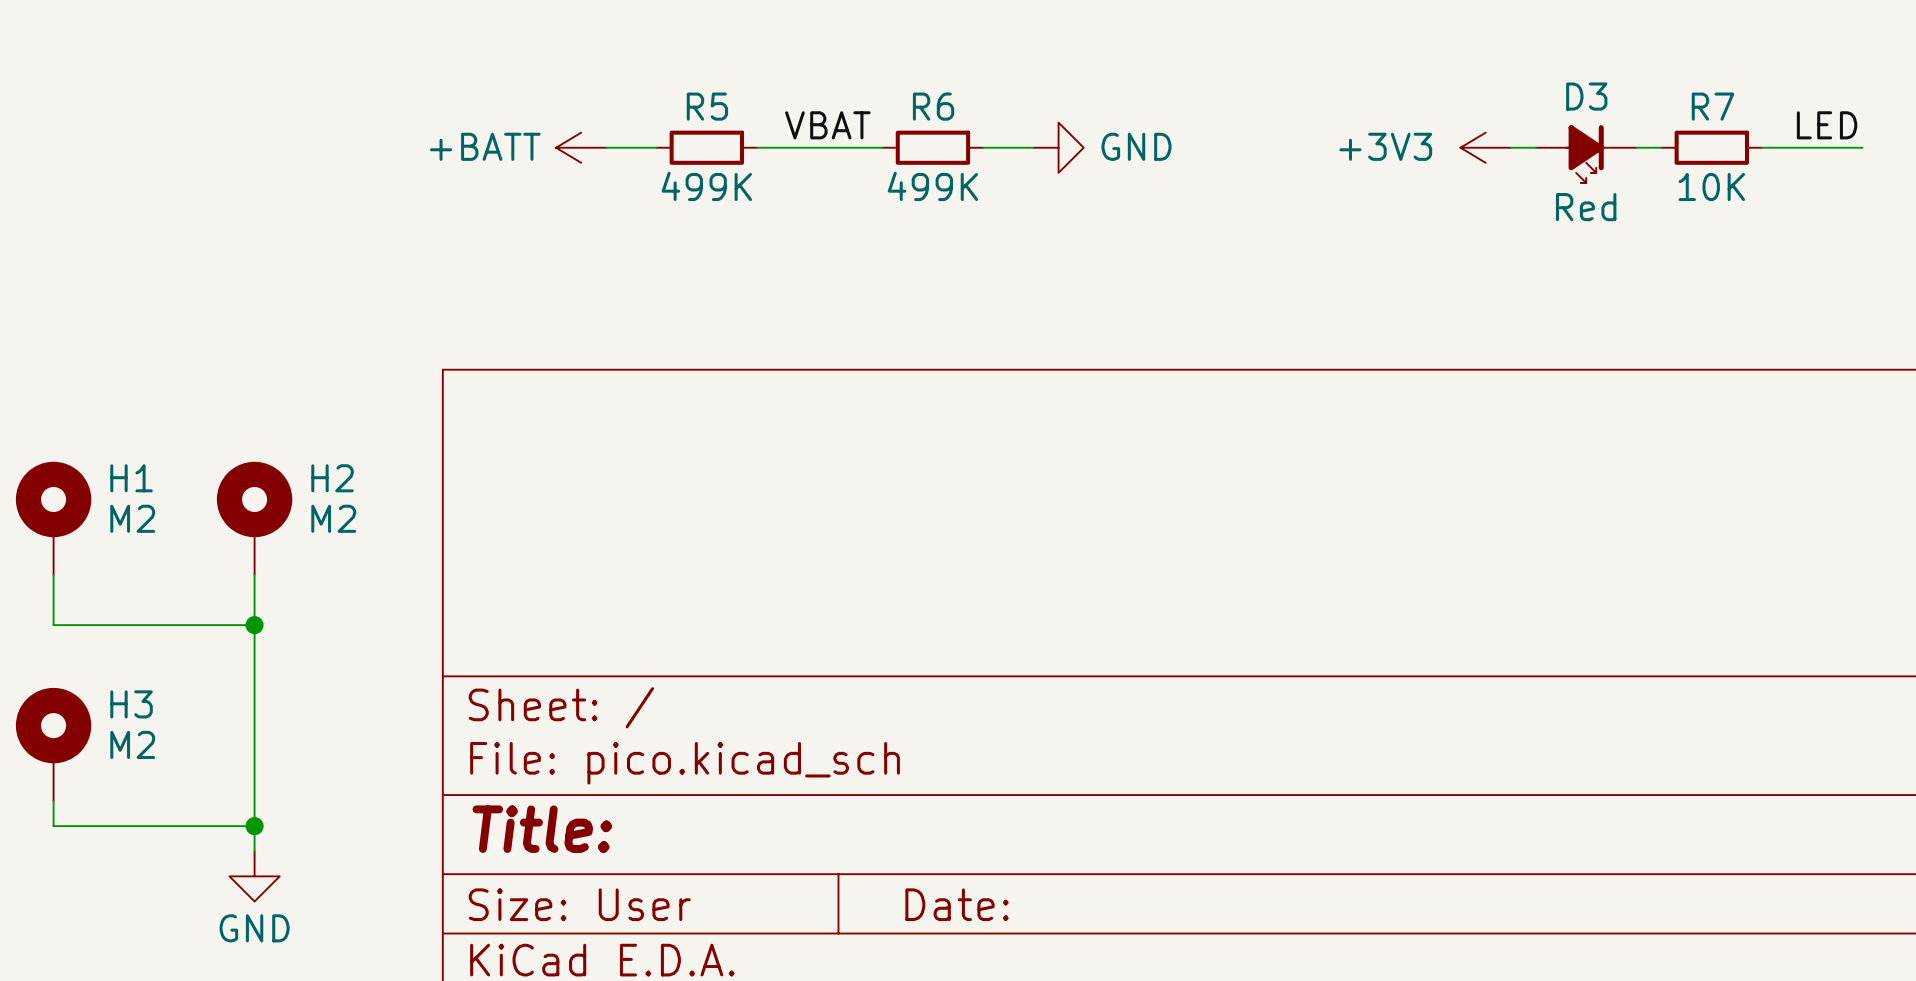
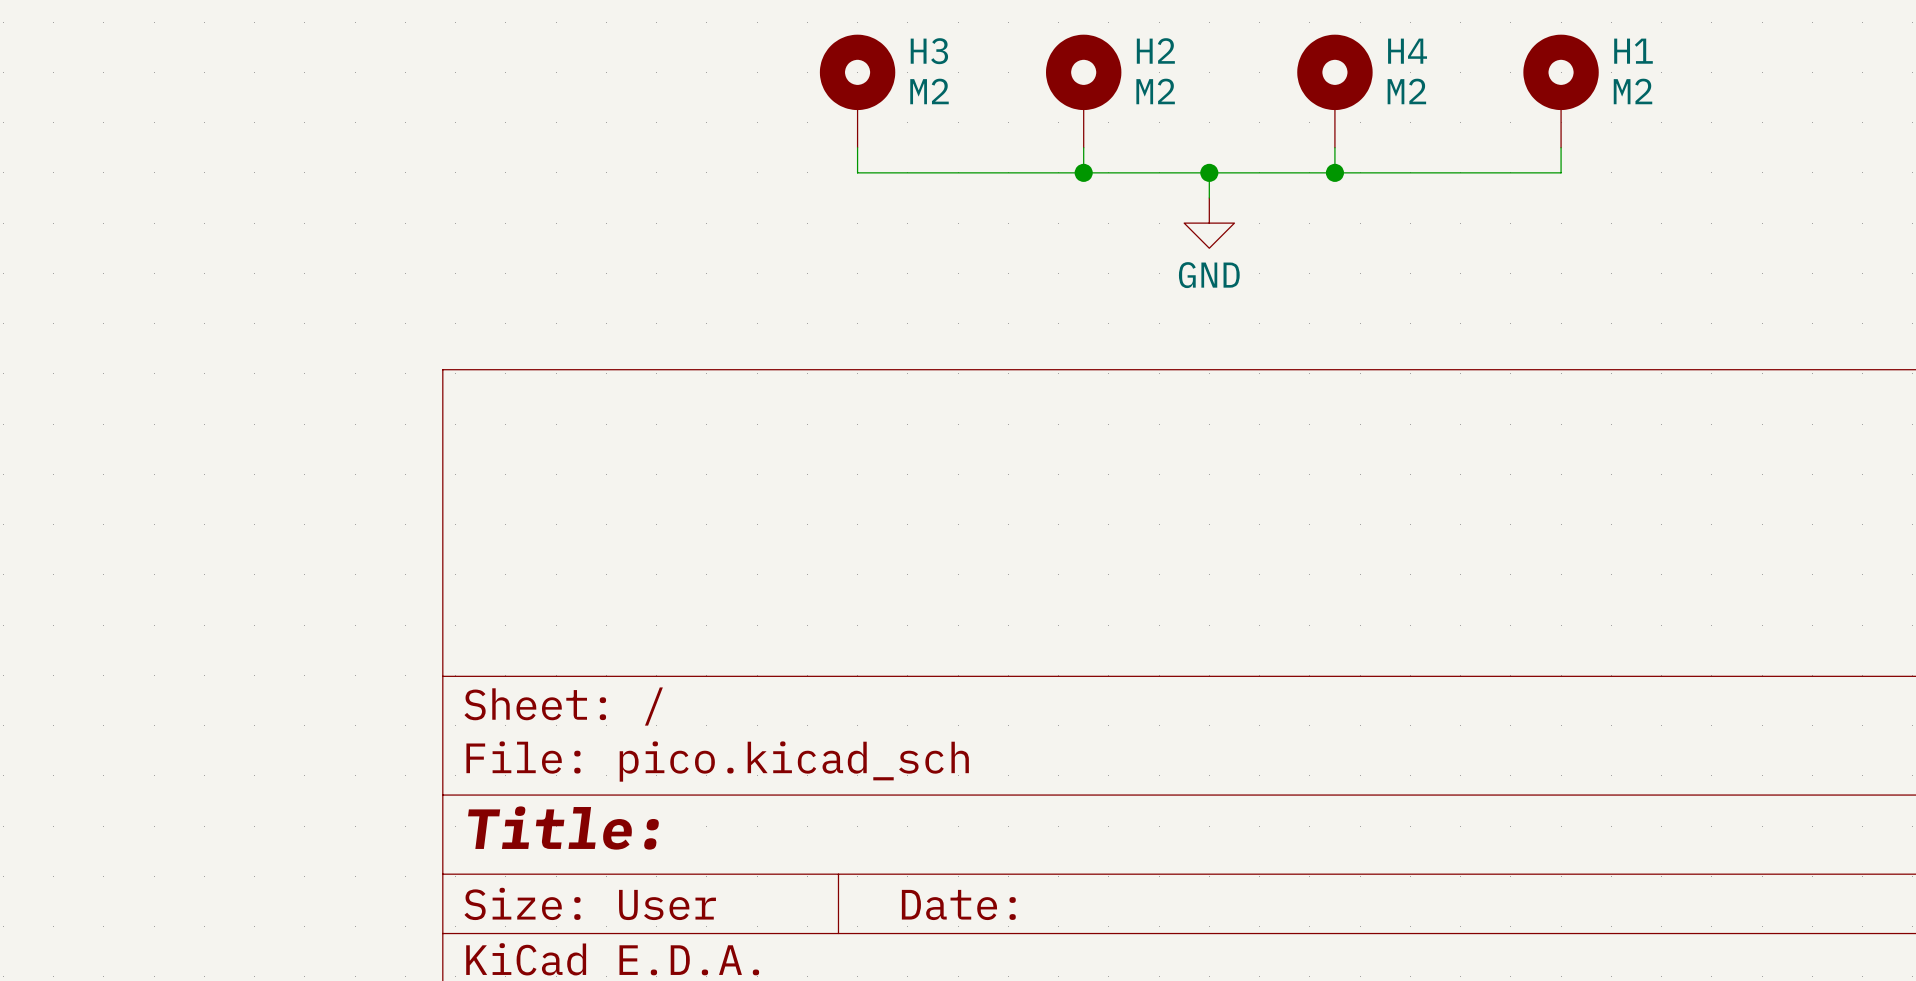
H4: none -> M2 (1334, 91)
label: VBAT (827, 125) -> none
label: LED (1827, 125) -> none
power symbol: +BATT (581, 147) -> none
wire: (606, 147) (656, 147) -> none
R5: 499K (706, 147) -> none
wire: (757, 147) (882, 147) -> none
wire: none -> (857, 147) (857, 172) (1561, 172) (1561, 147)
R6: 499K (932, 147) -> none
wire: (983, 147) (1033, 147) -> none
power symbol rotation: 0° (1058, 147) -> 90° clockwise (1209, 223)
power symbol position: GND (1058, 147) -> GND (1209, 223)
wire: none -> (1083, 147) (1083, 172)
wire: none -> (1334, 147) (1334, 172)
power symbol: +3V3 (1485, 147) -> none
wire: (1510, 147) (1535, 147) -> none
wire: (1636, 147) (1661, 147) -> none
R7: 10K (1711, 147) -> none
wire: (1762, 147) (1862, 147) -> none
D3: Red (1586, 154) -> none
junction: none -> (1083, 172)
wire: none -> (1209, 172) (1209, 197)
junction: none -> (1209, 172)
junction: none -> (1334, 172)
H1 position: (53, 518) -> (1561, 91)
H2 position: (254, 518) -> (1083, 91)
wire: (53, 574) (53, 625) (254, 625) -> none
wire: (254, 574) (254, 851) -> none
junction: (254, 625) -> none
H3 position: (53, 744) -> (857, 91)
wire: (53, 800) (53, 826) (254, 826) -> none
junction: (254, 826) -> none
power symbol: GND (254, 876) -> none

